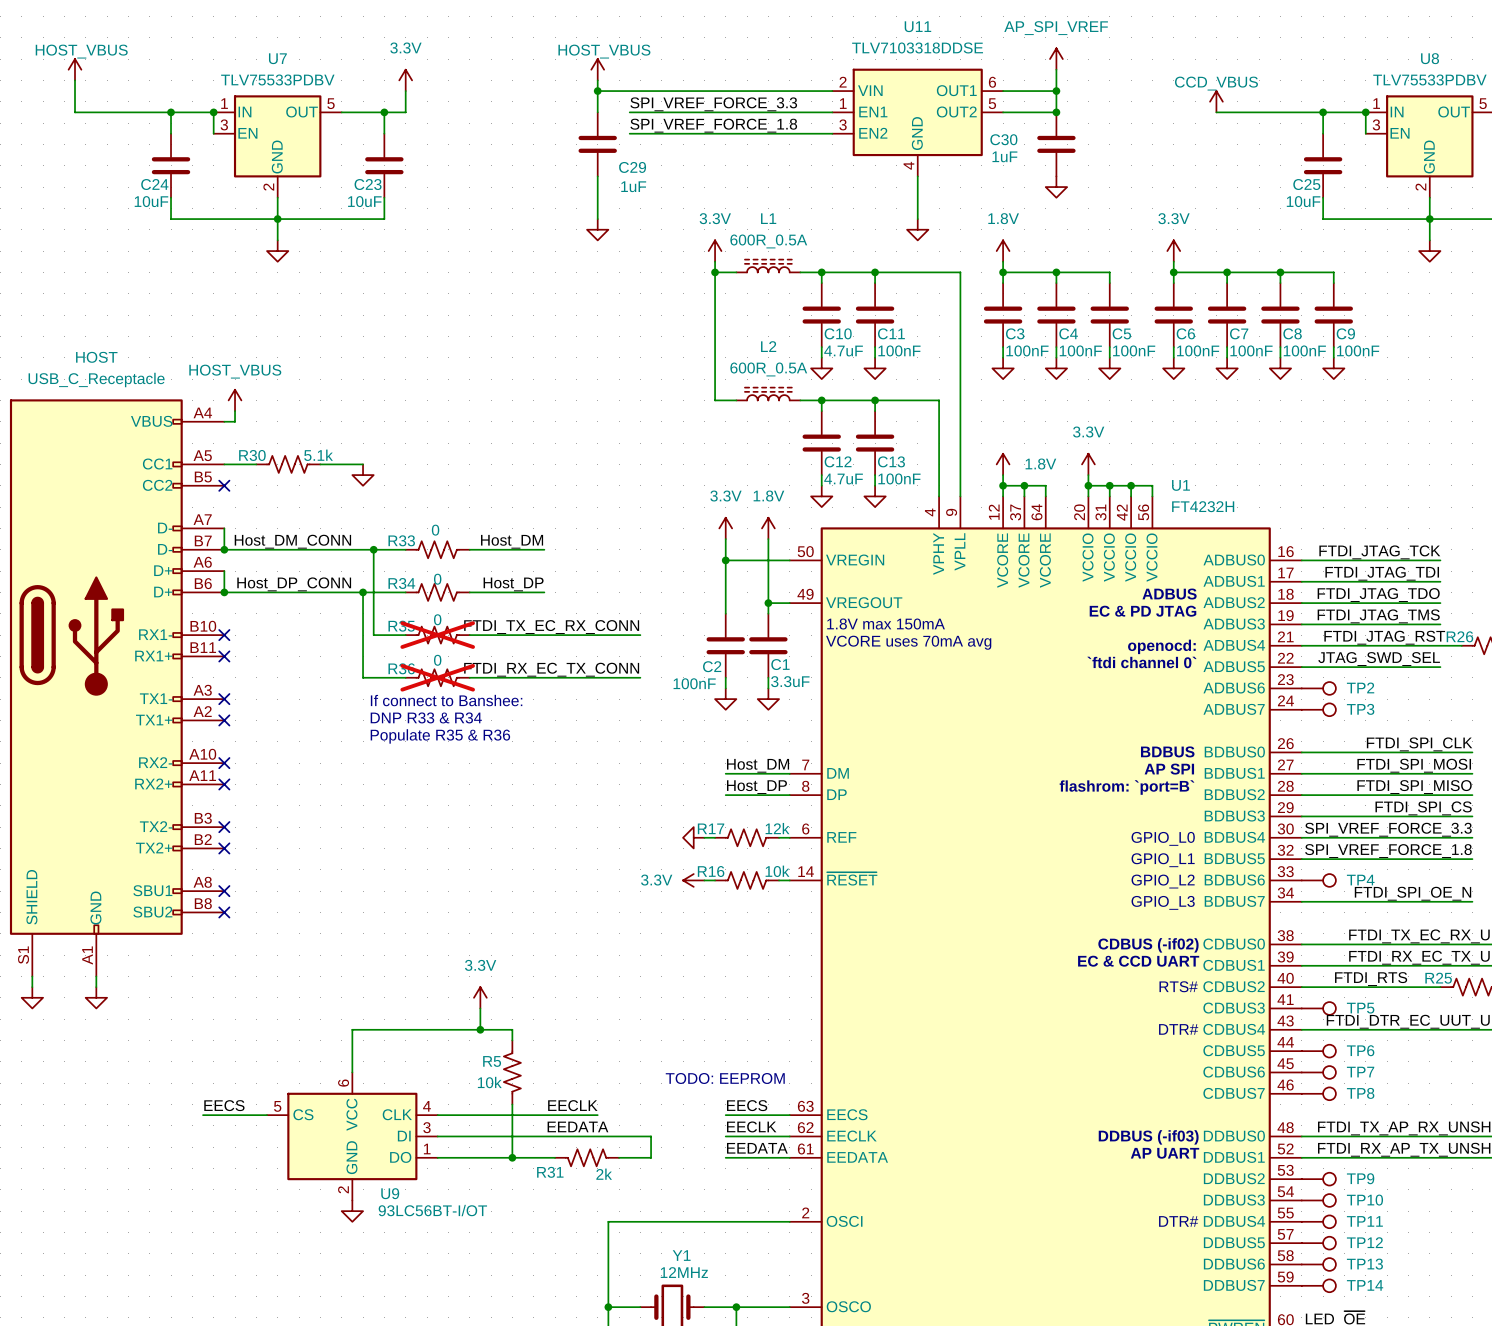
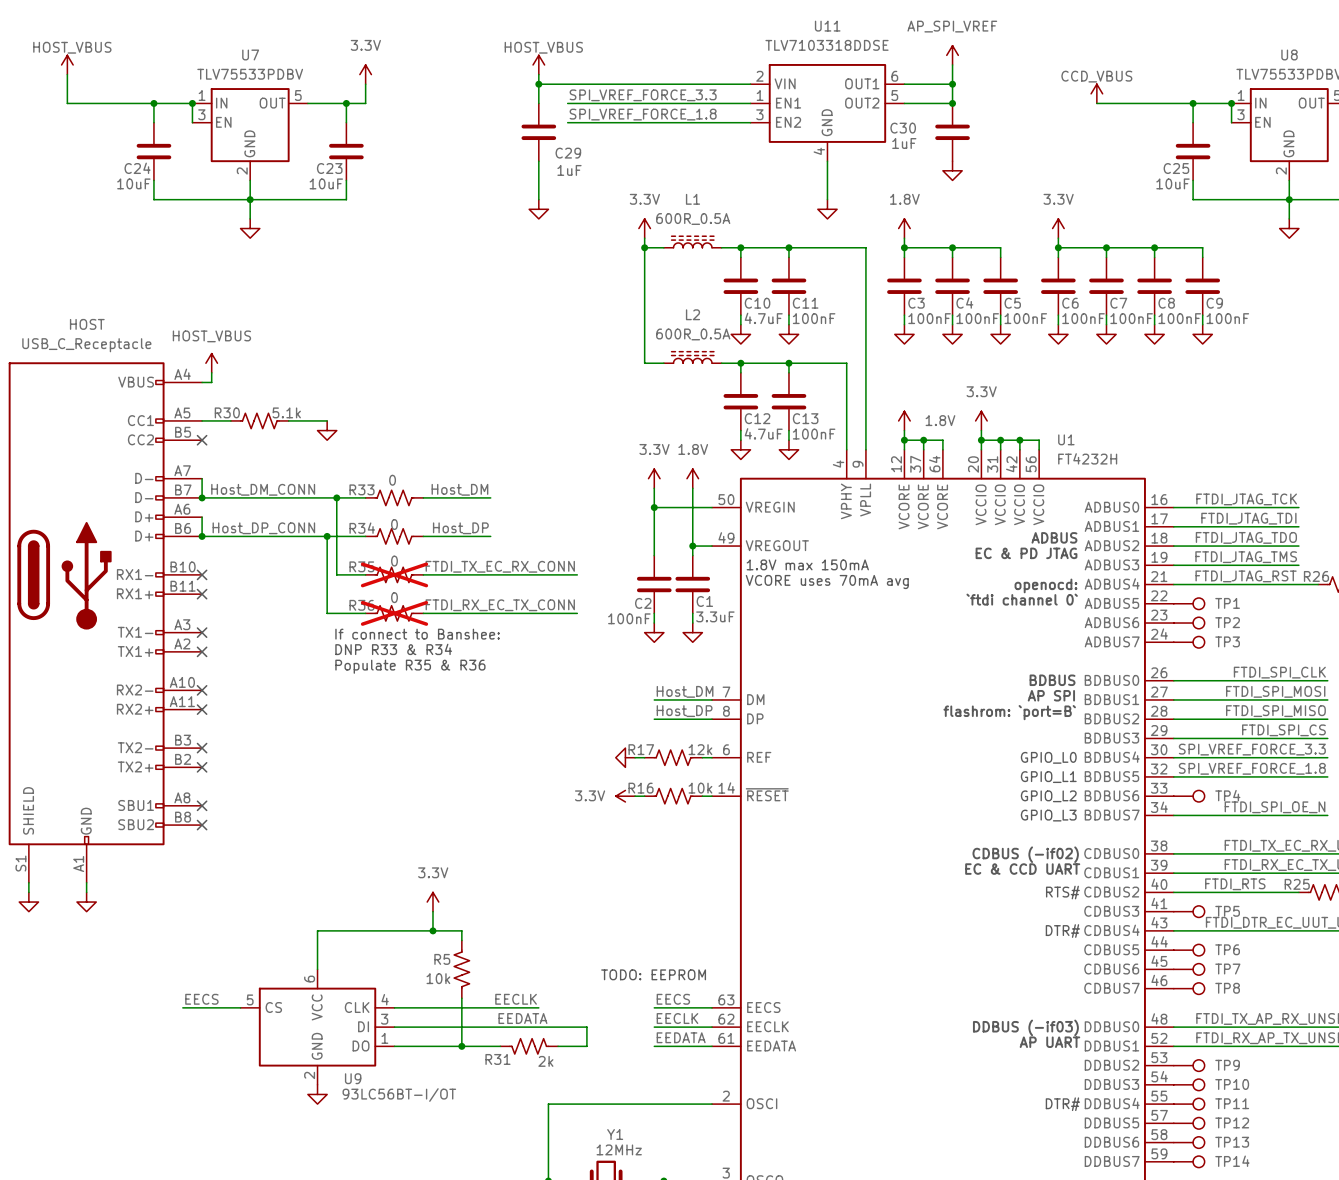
label: JTAG_SWD_SEL (1379, 659) -> none
wire: (1301, 667) (1440, 667) -> none
TP1: none -> (1189, 603)

